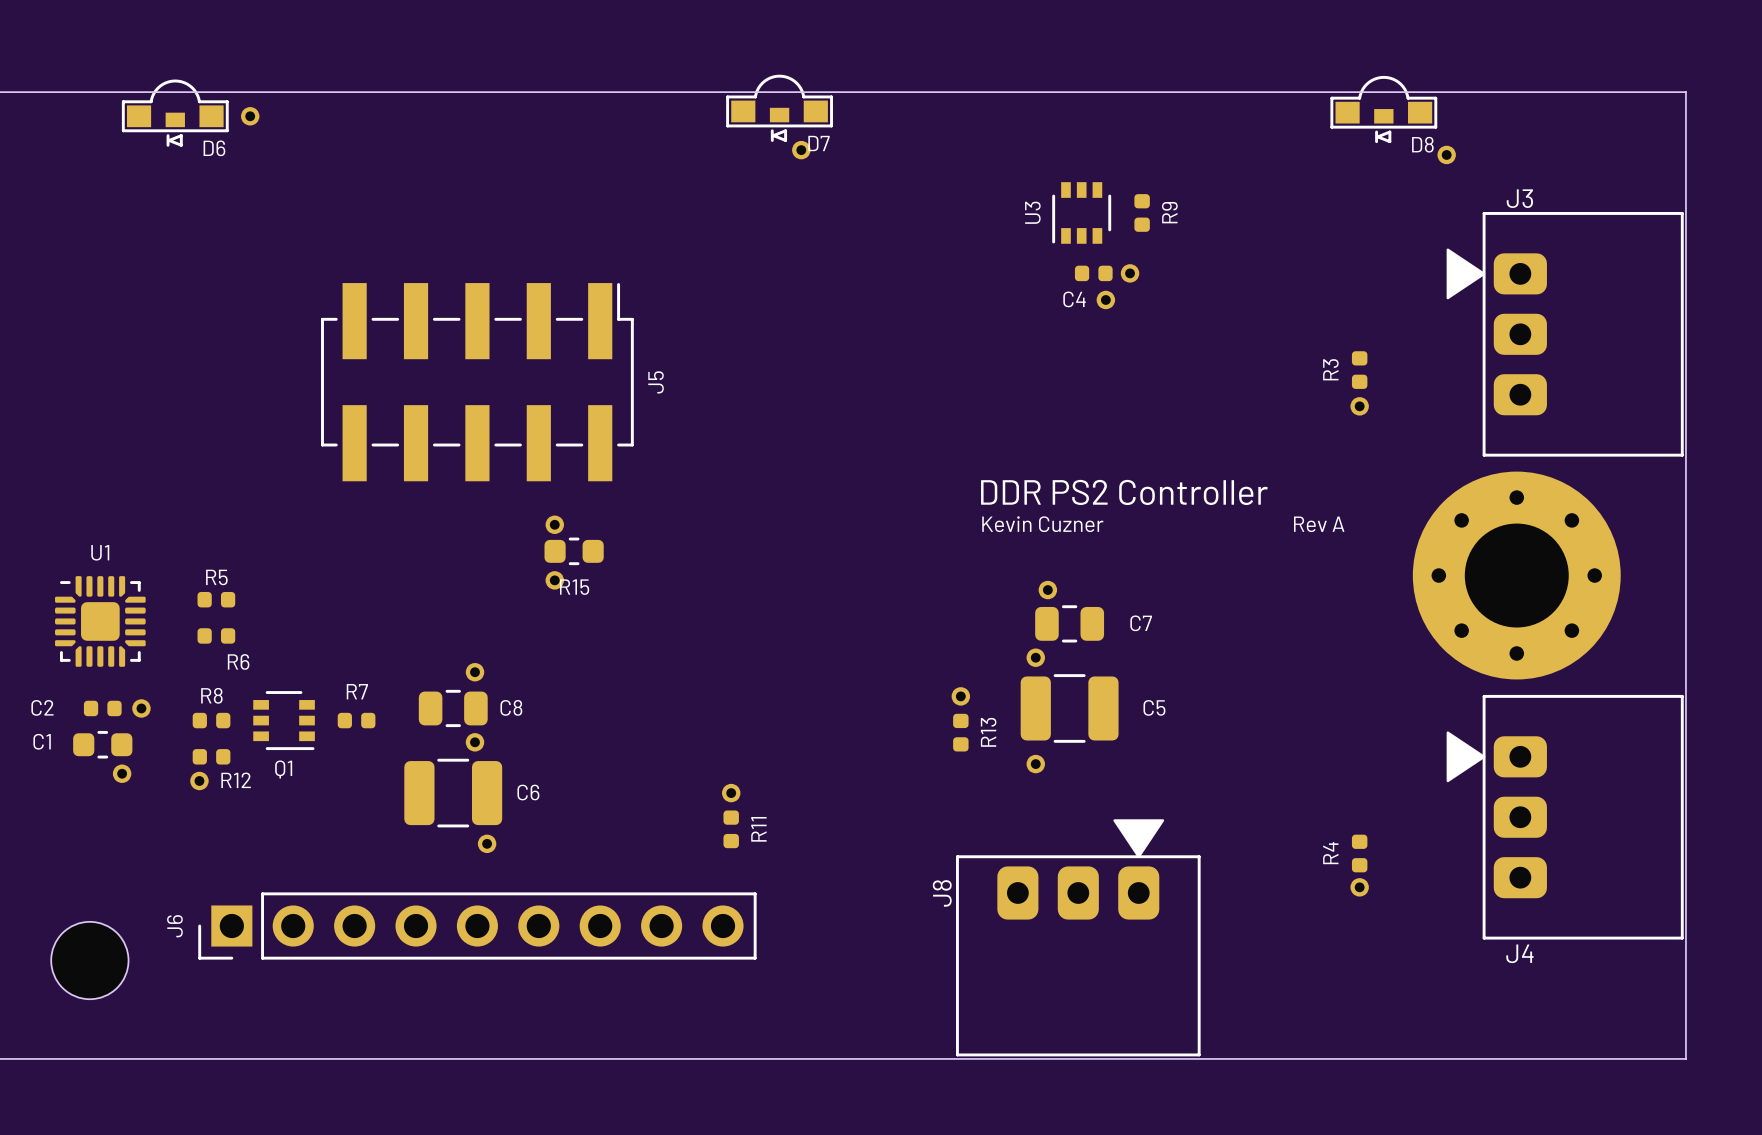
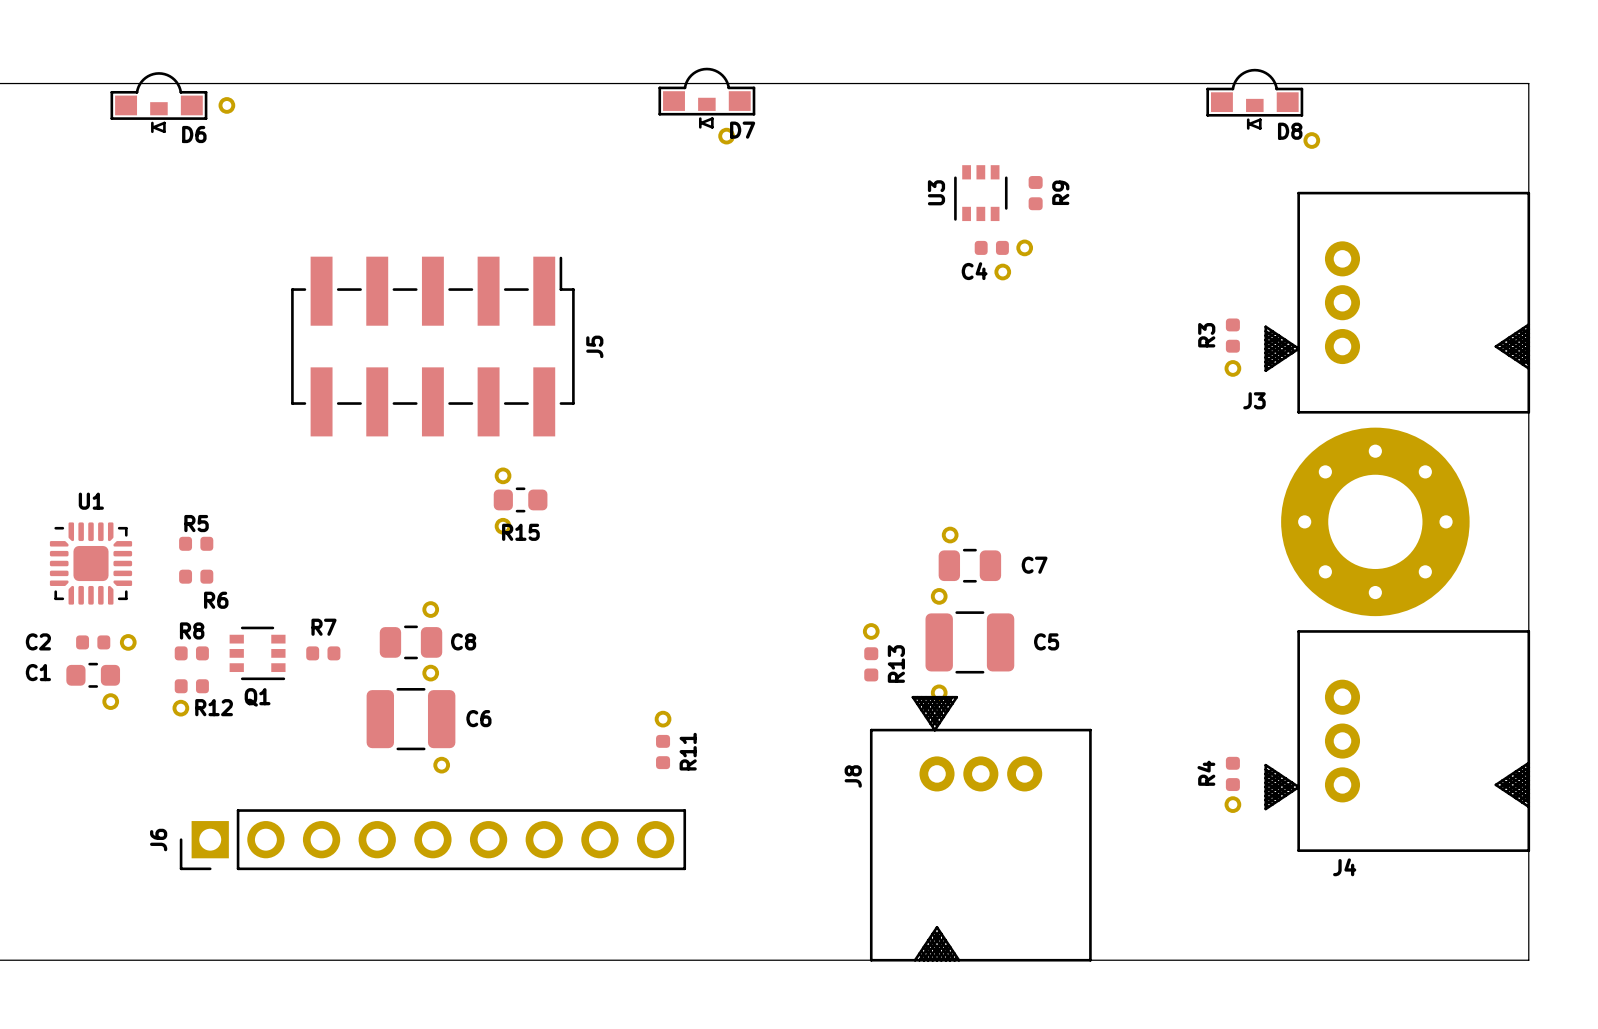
J3 name position: J3 (1519, 198) -> J3 (1254, 400)
J3 footprint: [1446, 212, 1684, 457] -> [1264, 191, 1531, 414]
text: DDR PS2 Controller (1124, 492) -> none
text: Kevin Cuzner (1042, 524) -> none
text: Rev A (1319, 524) -> none
J4 footprint: [1446, 694, 1684, 940] -> [1264, 630, 1531, 852]
J8 footprint: [956, 819, 1201, 1057] -> [869, 695, 1092, 962]
part: (89, 960) -> none

